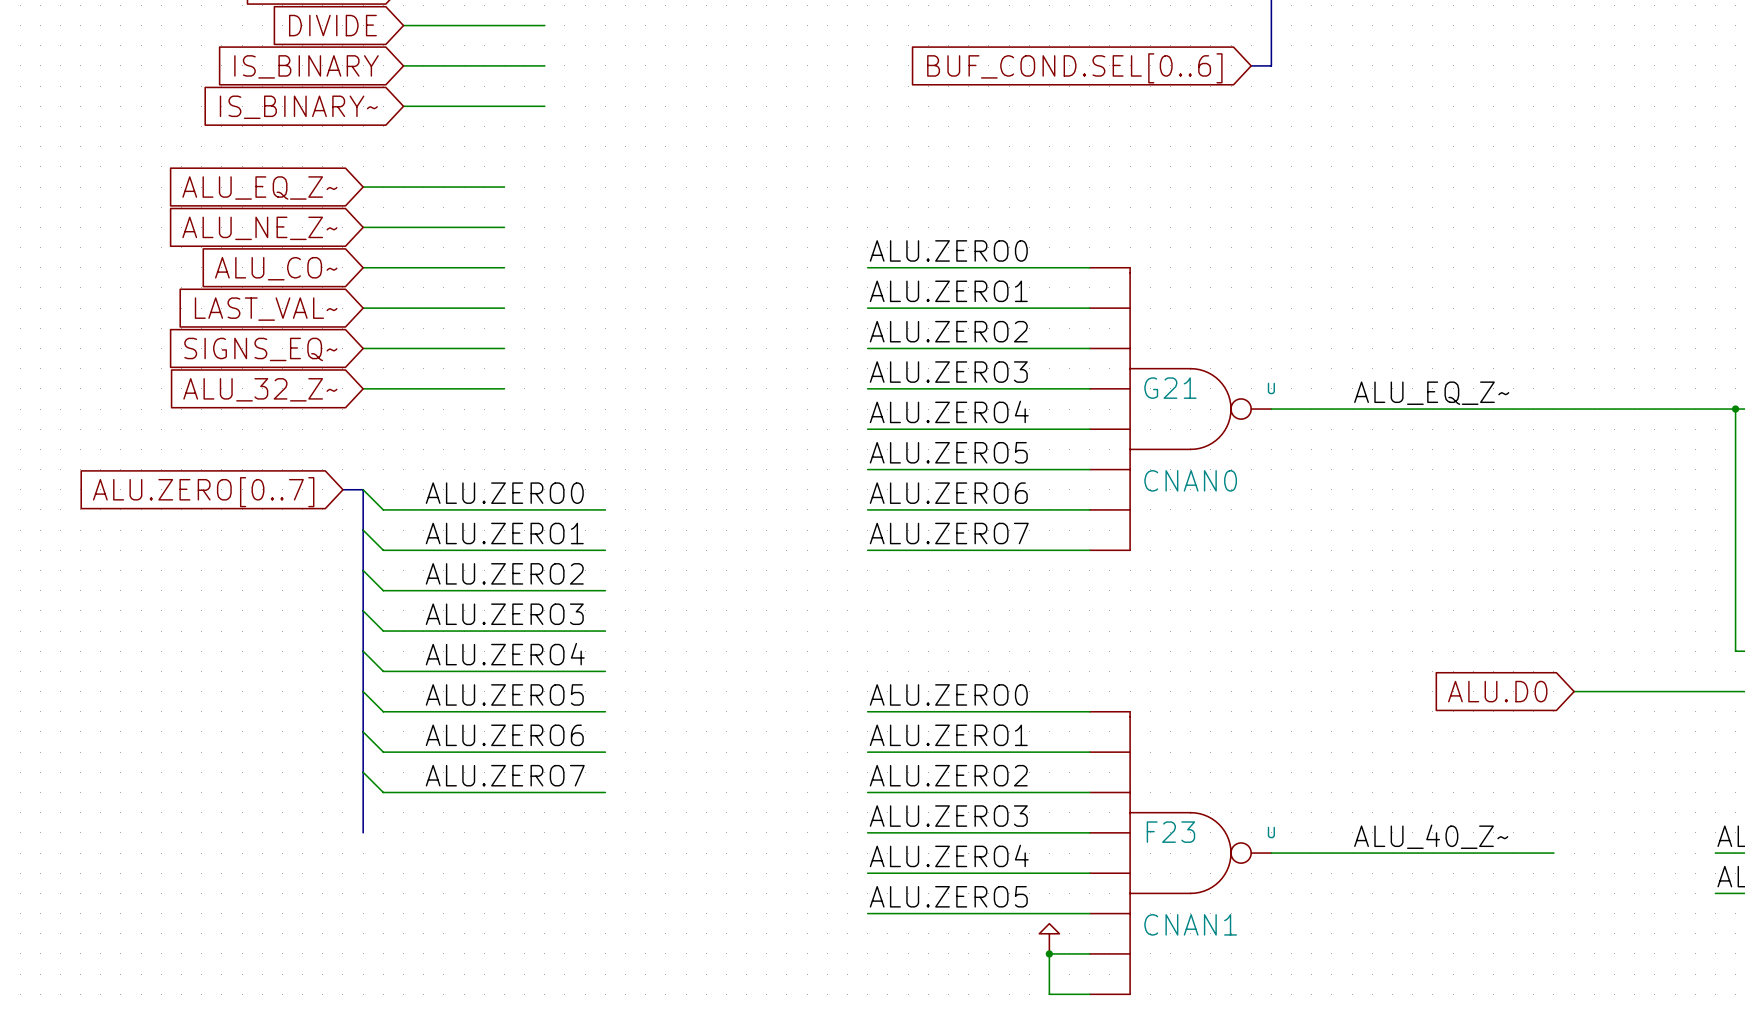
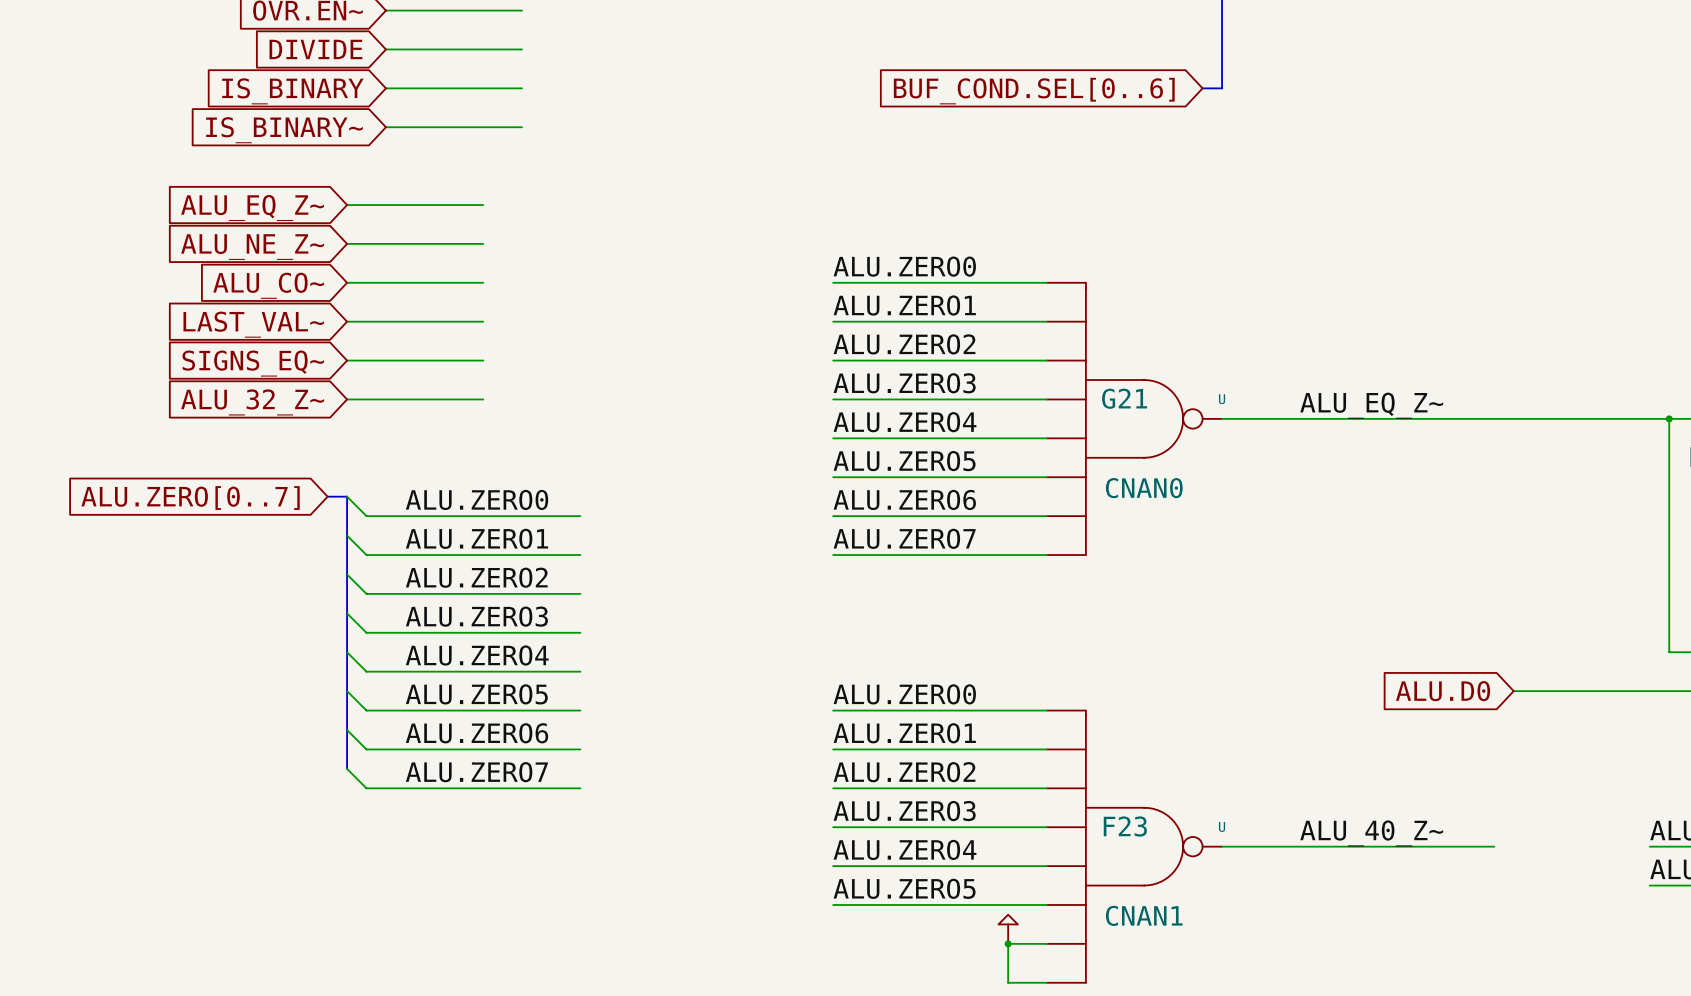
bus: (363, 772) (363, 832) -> none

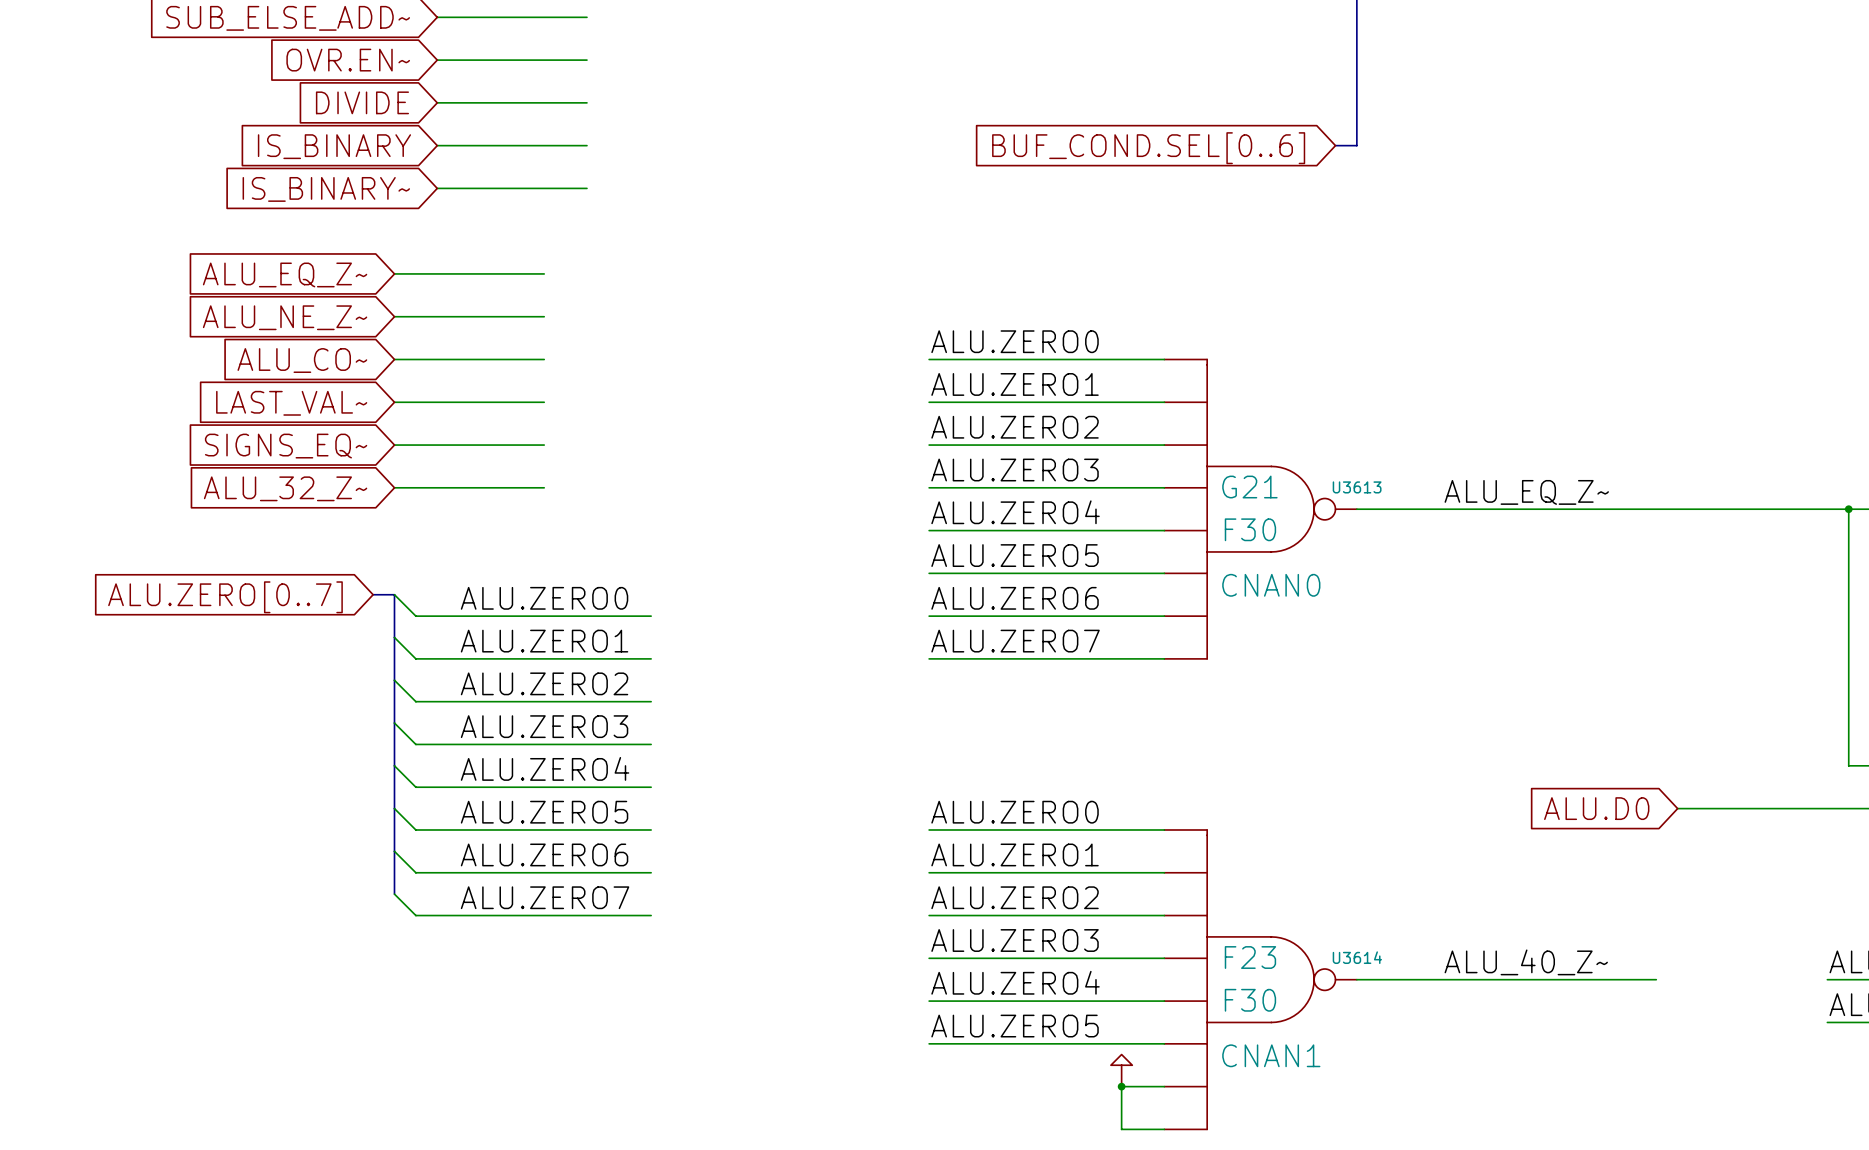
U name: U (1222, 399) -> U3613 (1357, 487)
U value: none -> F30 (1250, 529)
U name: U (1222, 826) -> U3614 (1357, 957)
U value: none -> F30 (1250, 1000)

